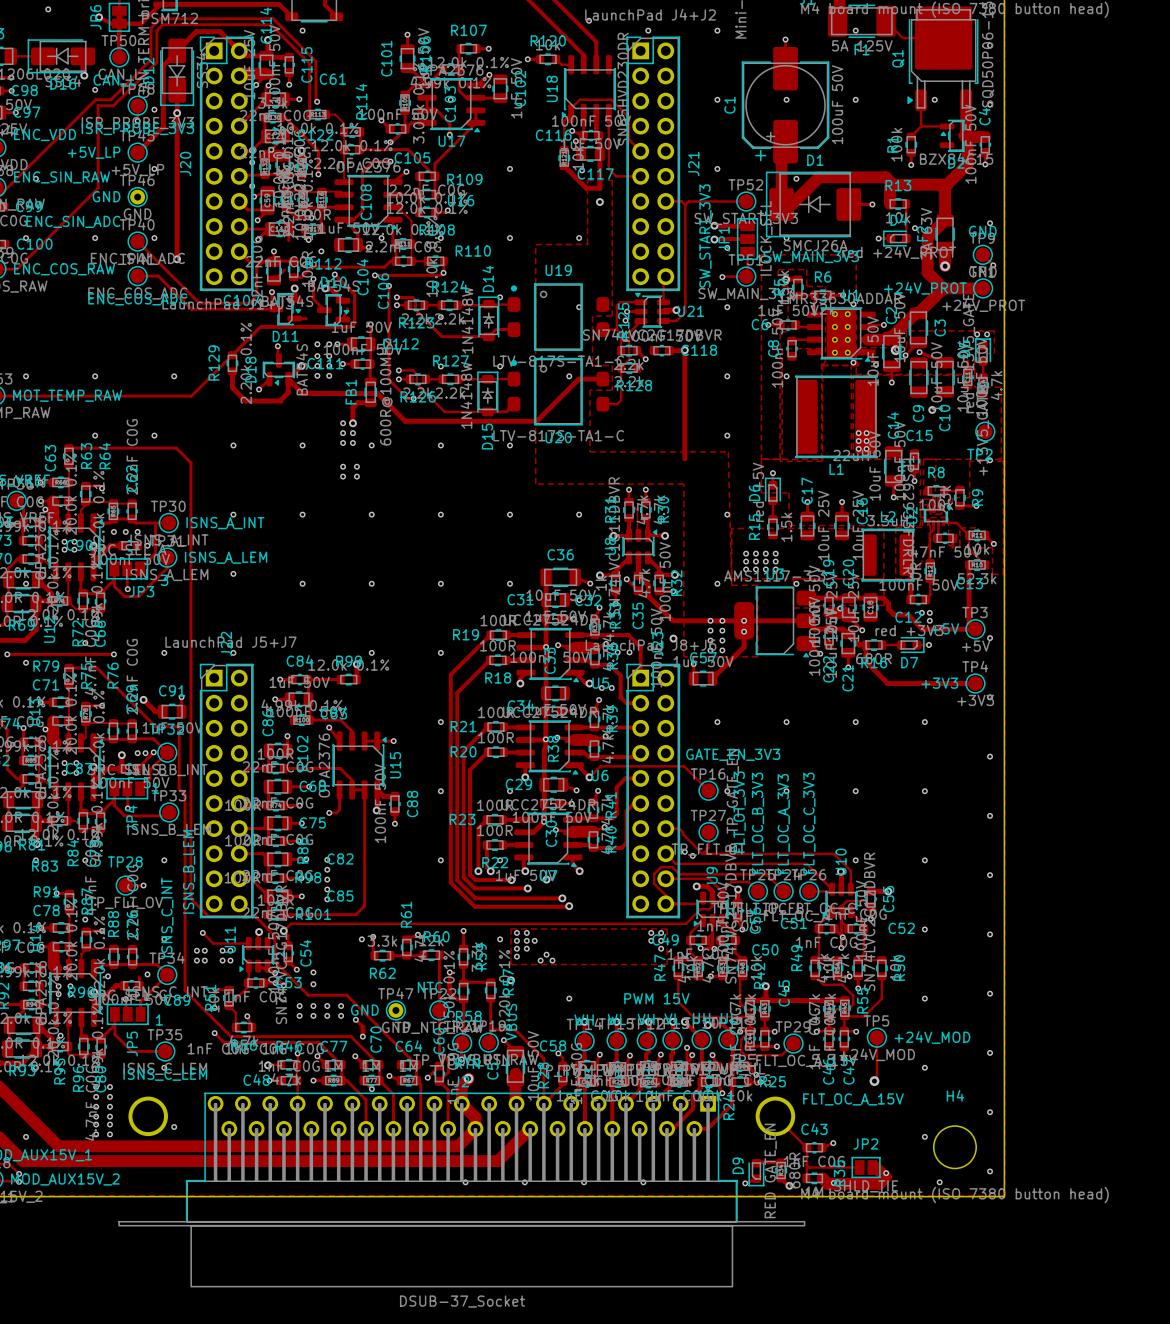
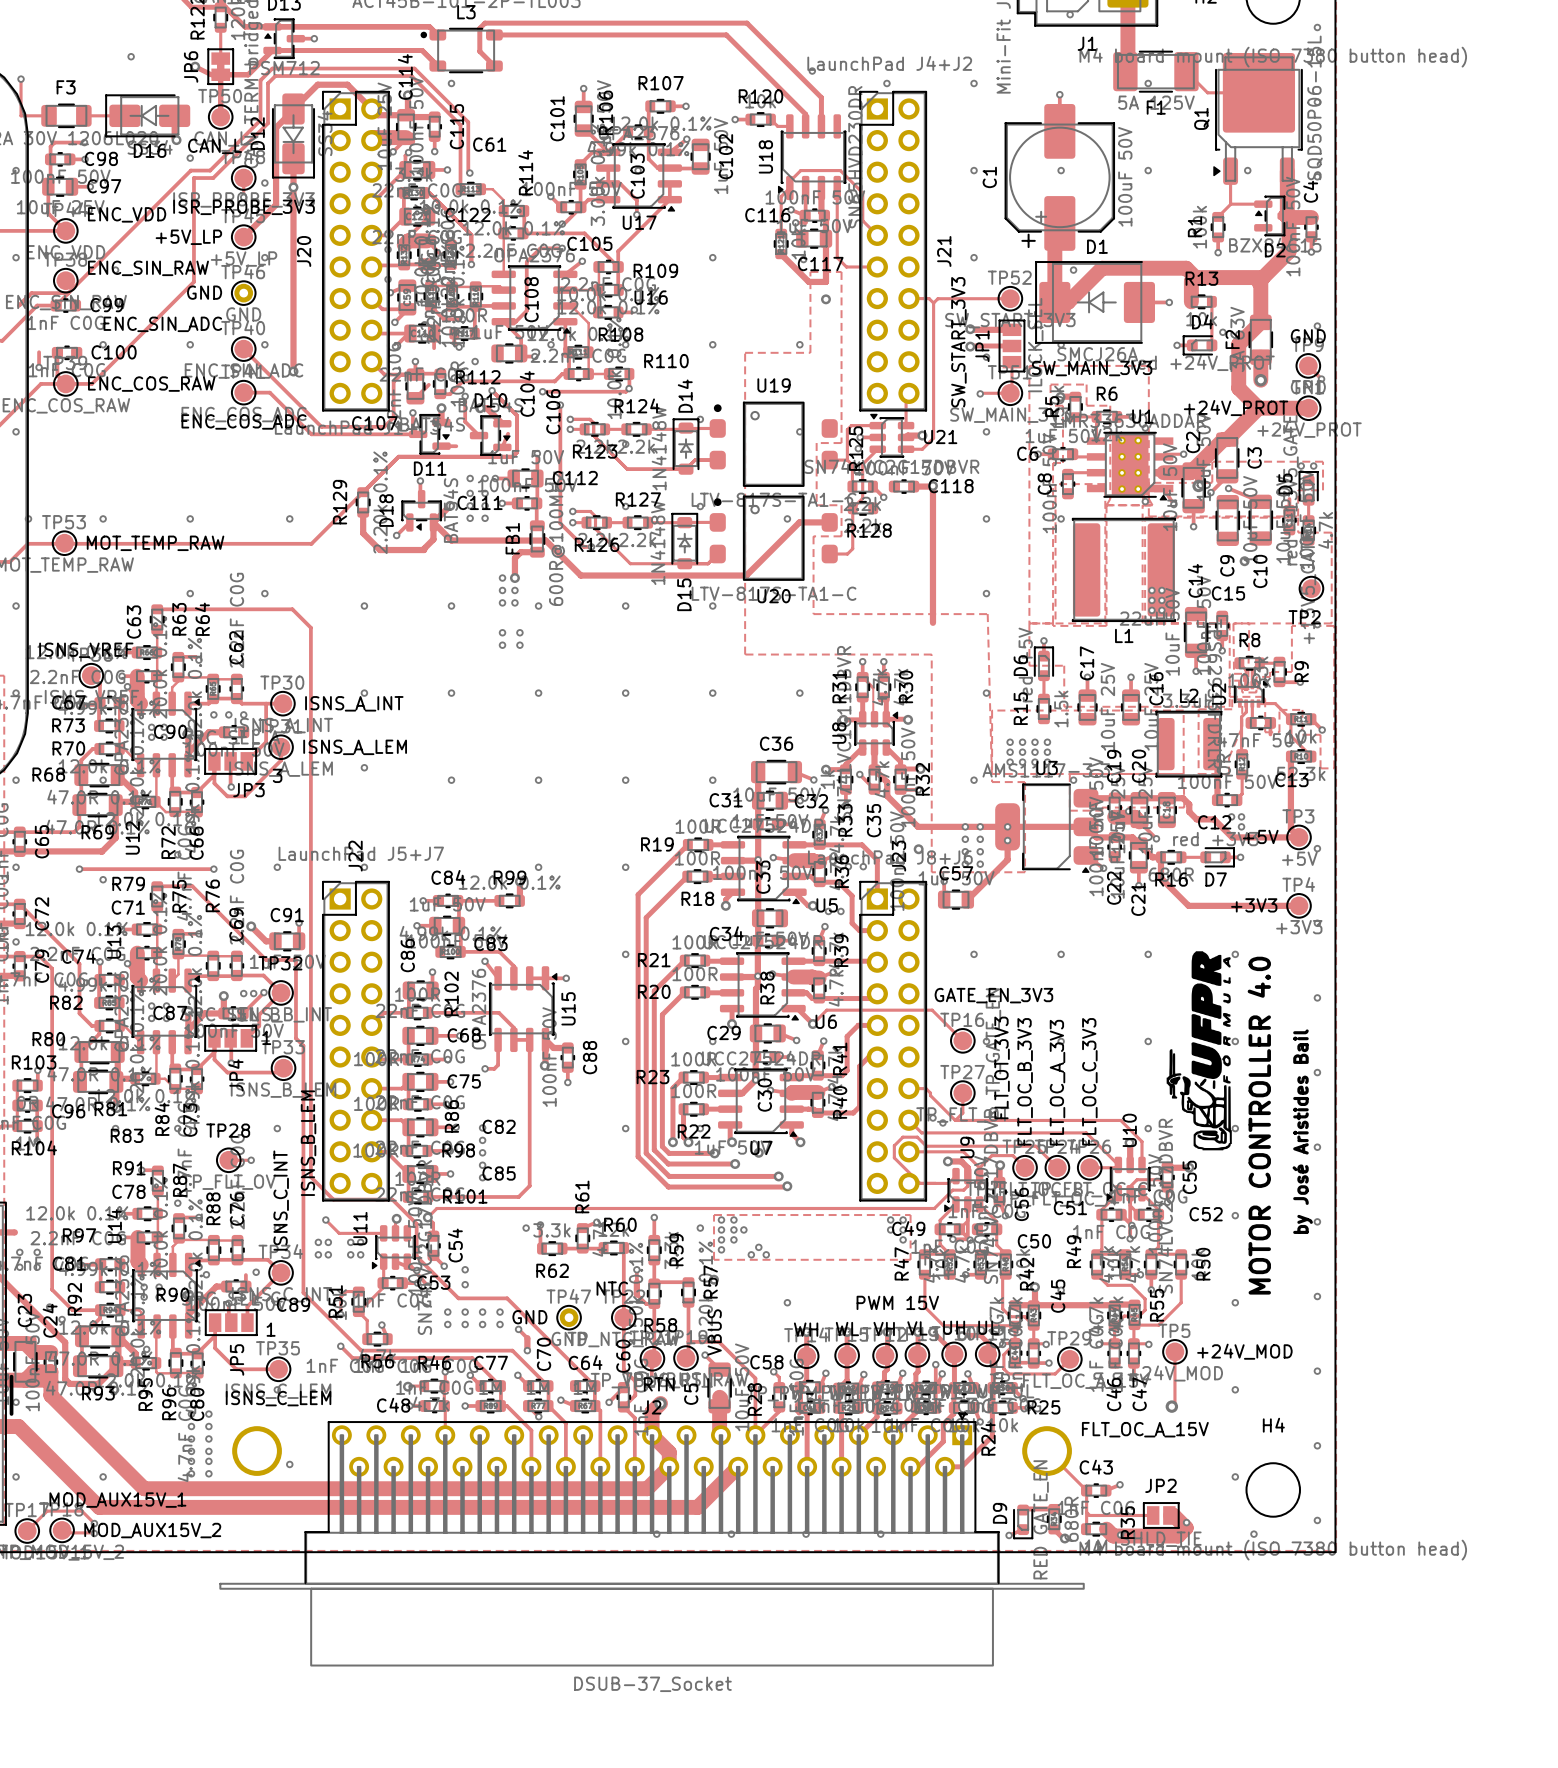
drawing: none -> [1166, 951, 1232, 1151]
text: none -> MOTOR CONTROLLER 4.0 (1259, 1125)
text: none -> by José Aristides Bail (1302, 1131)

